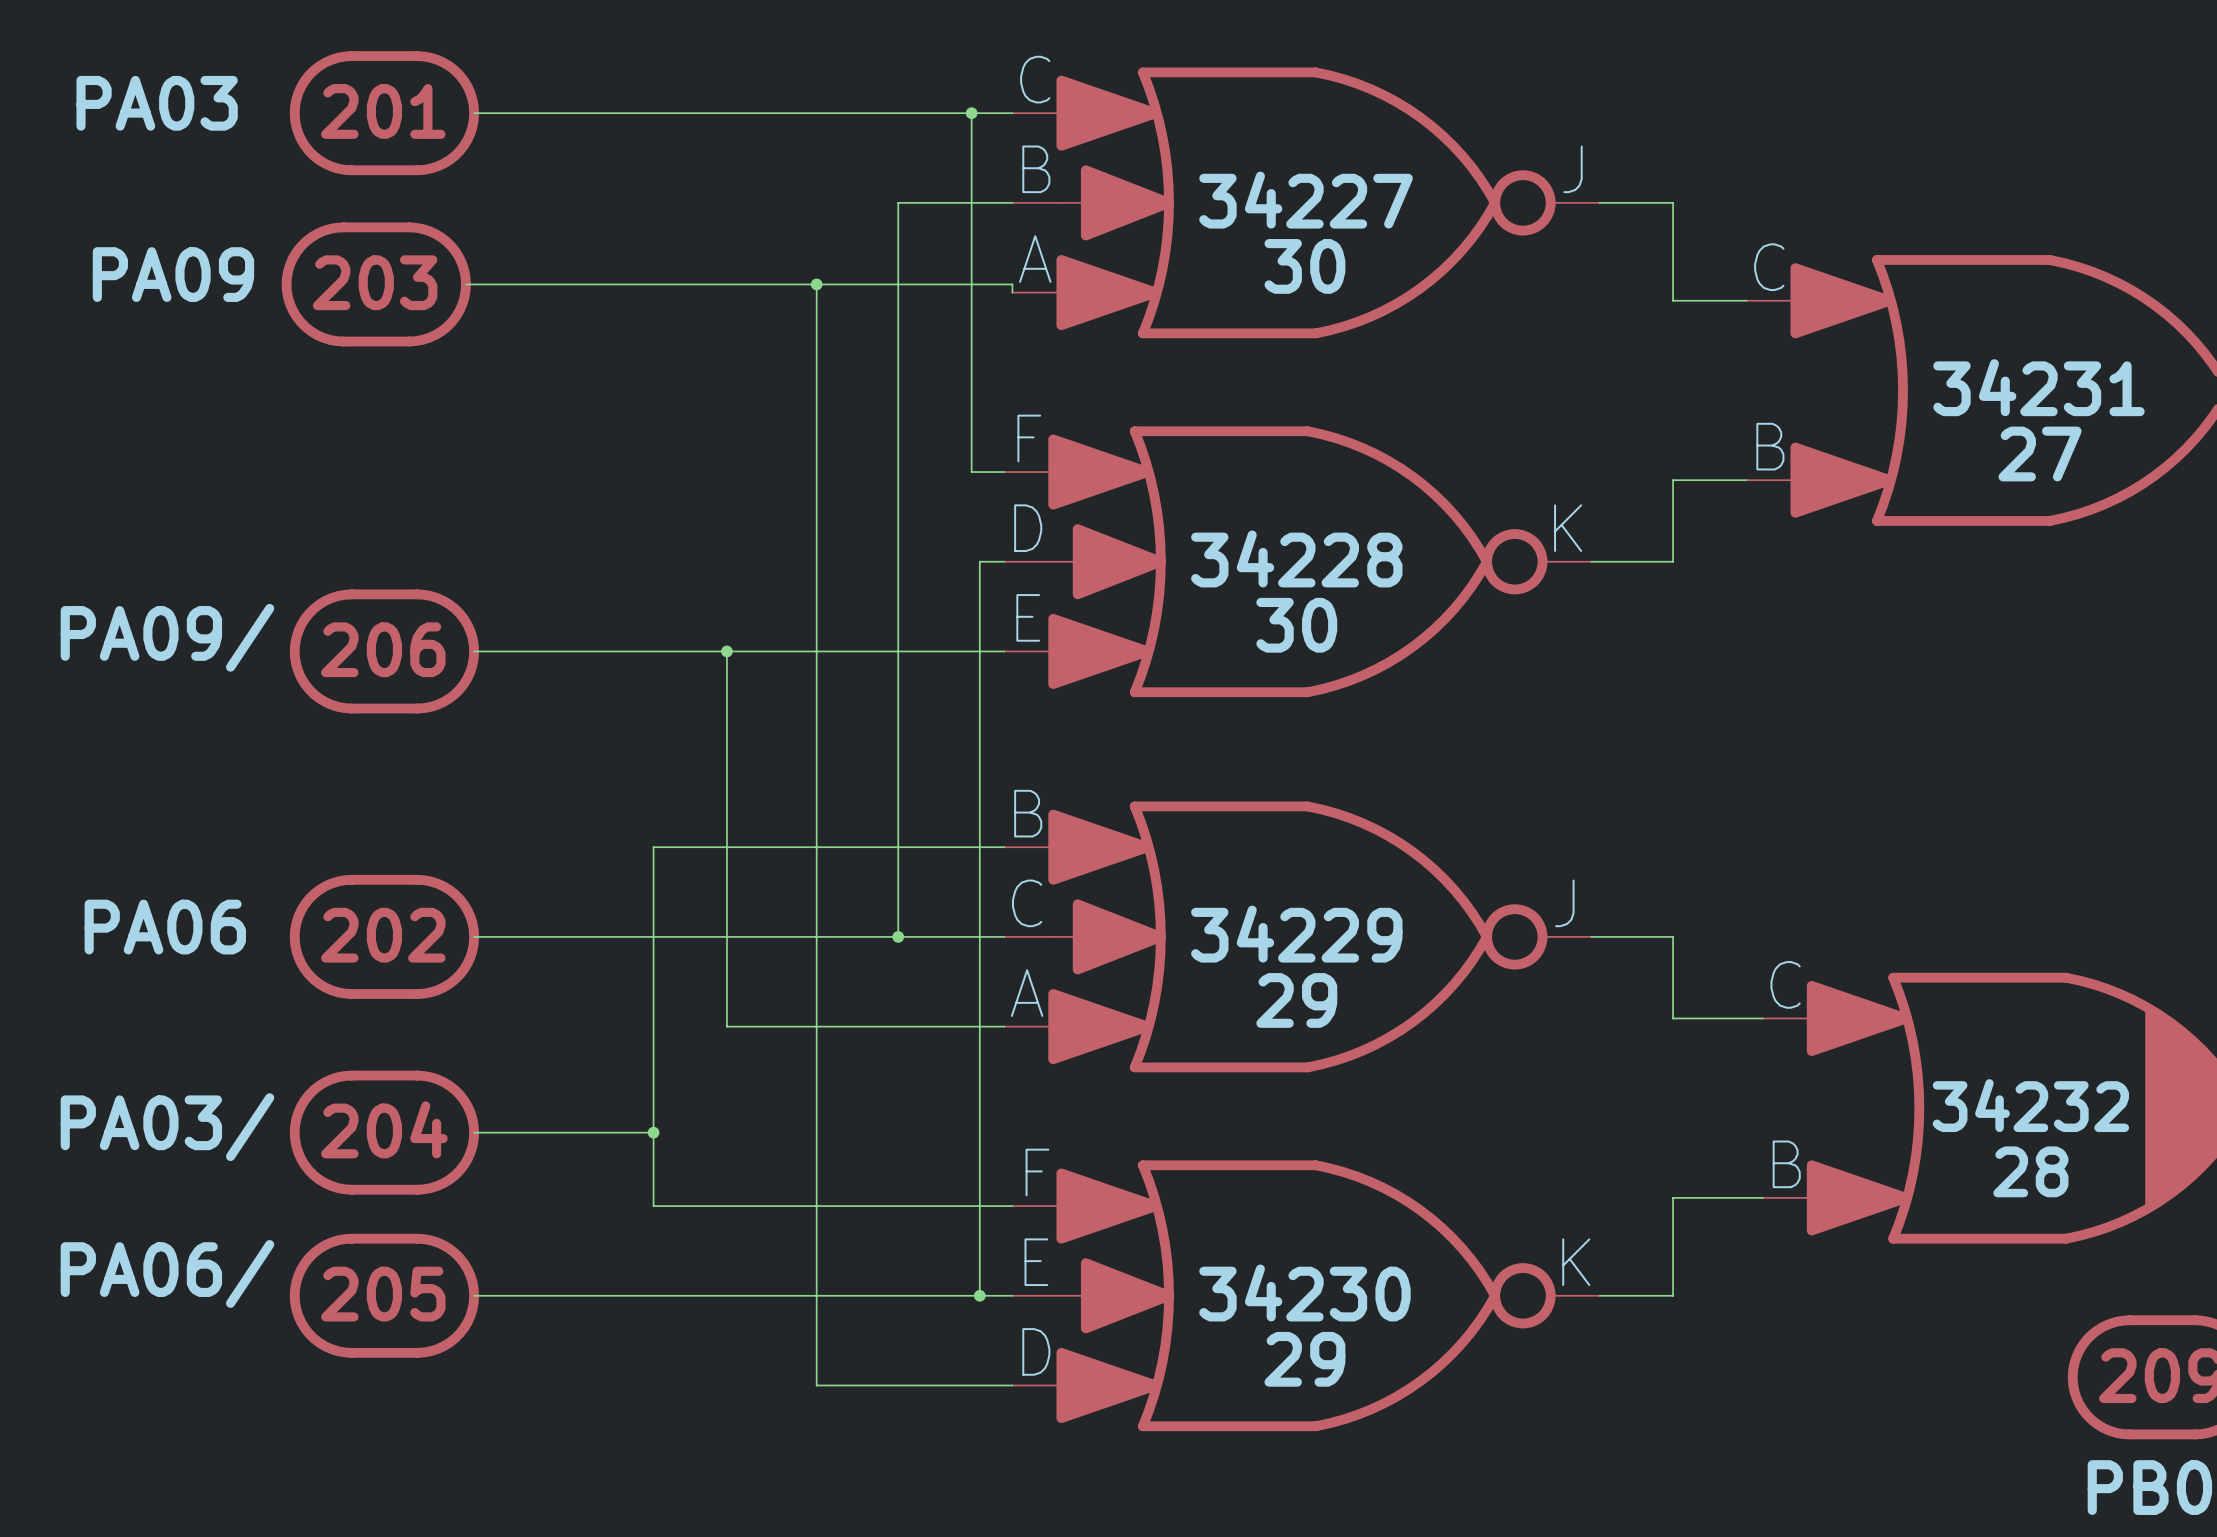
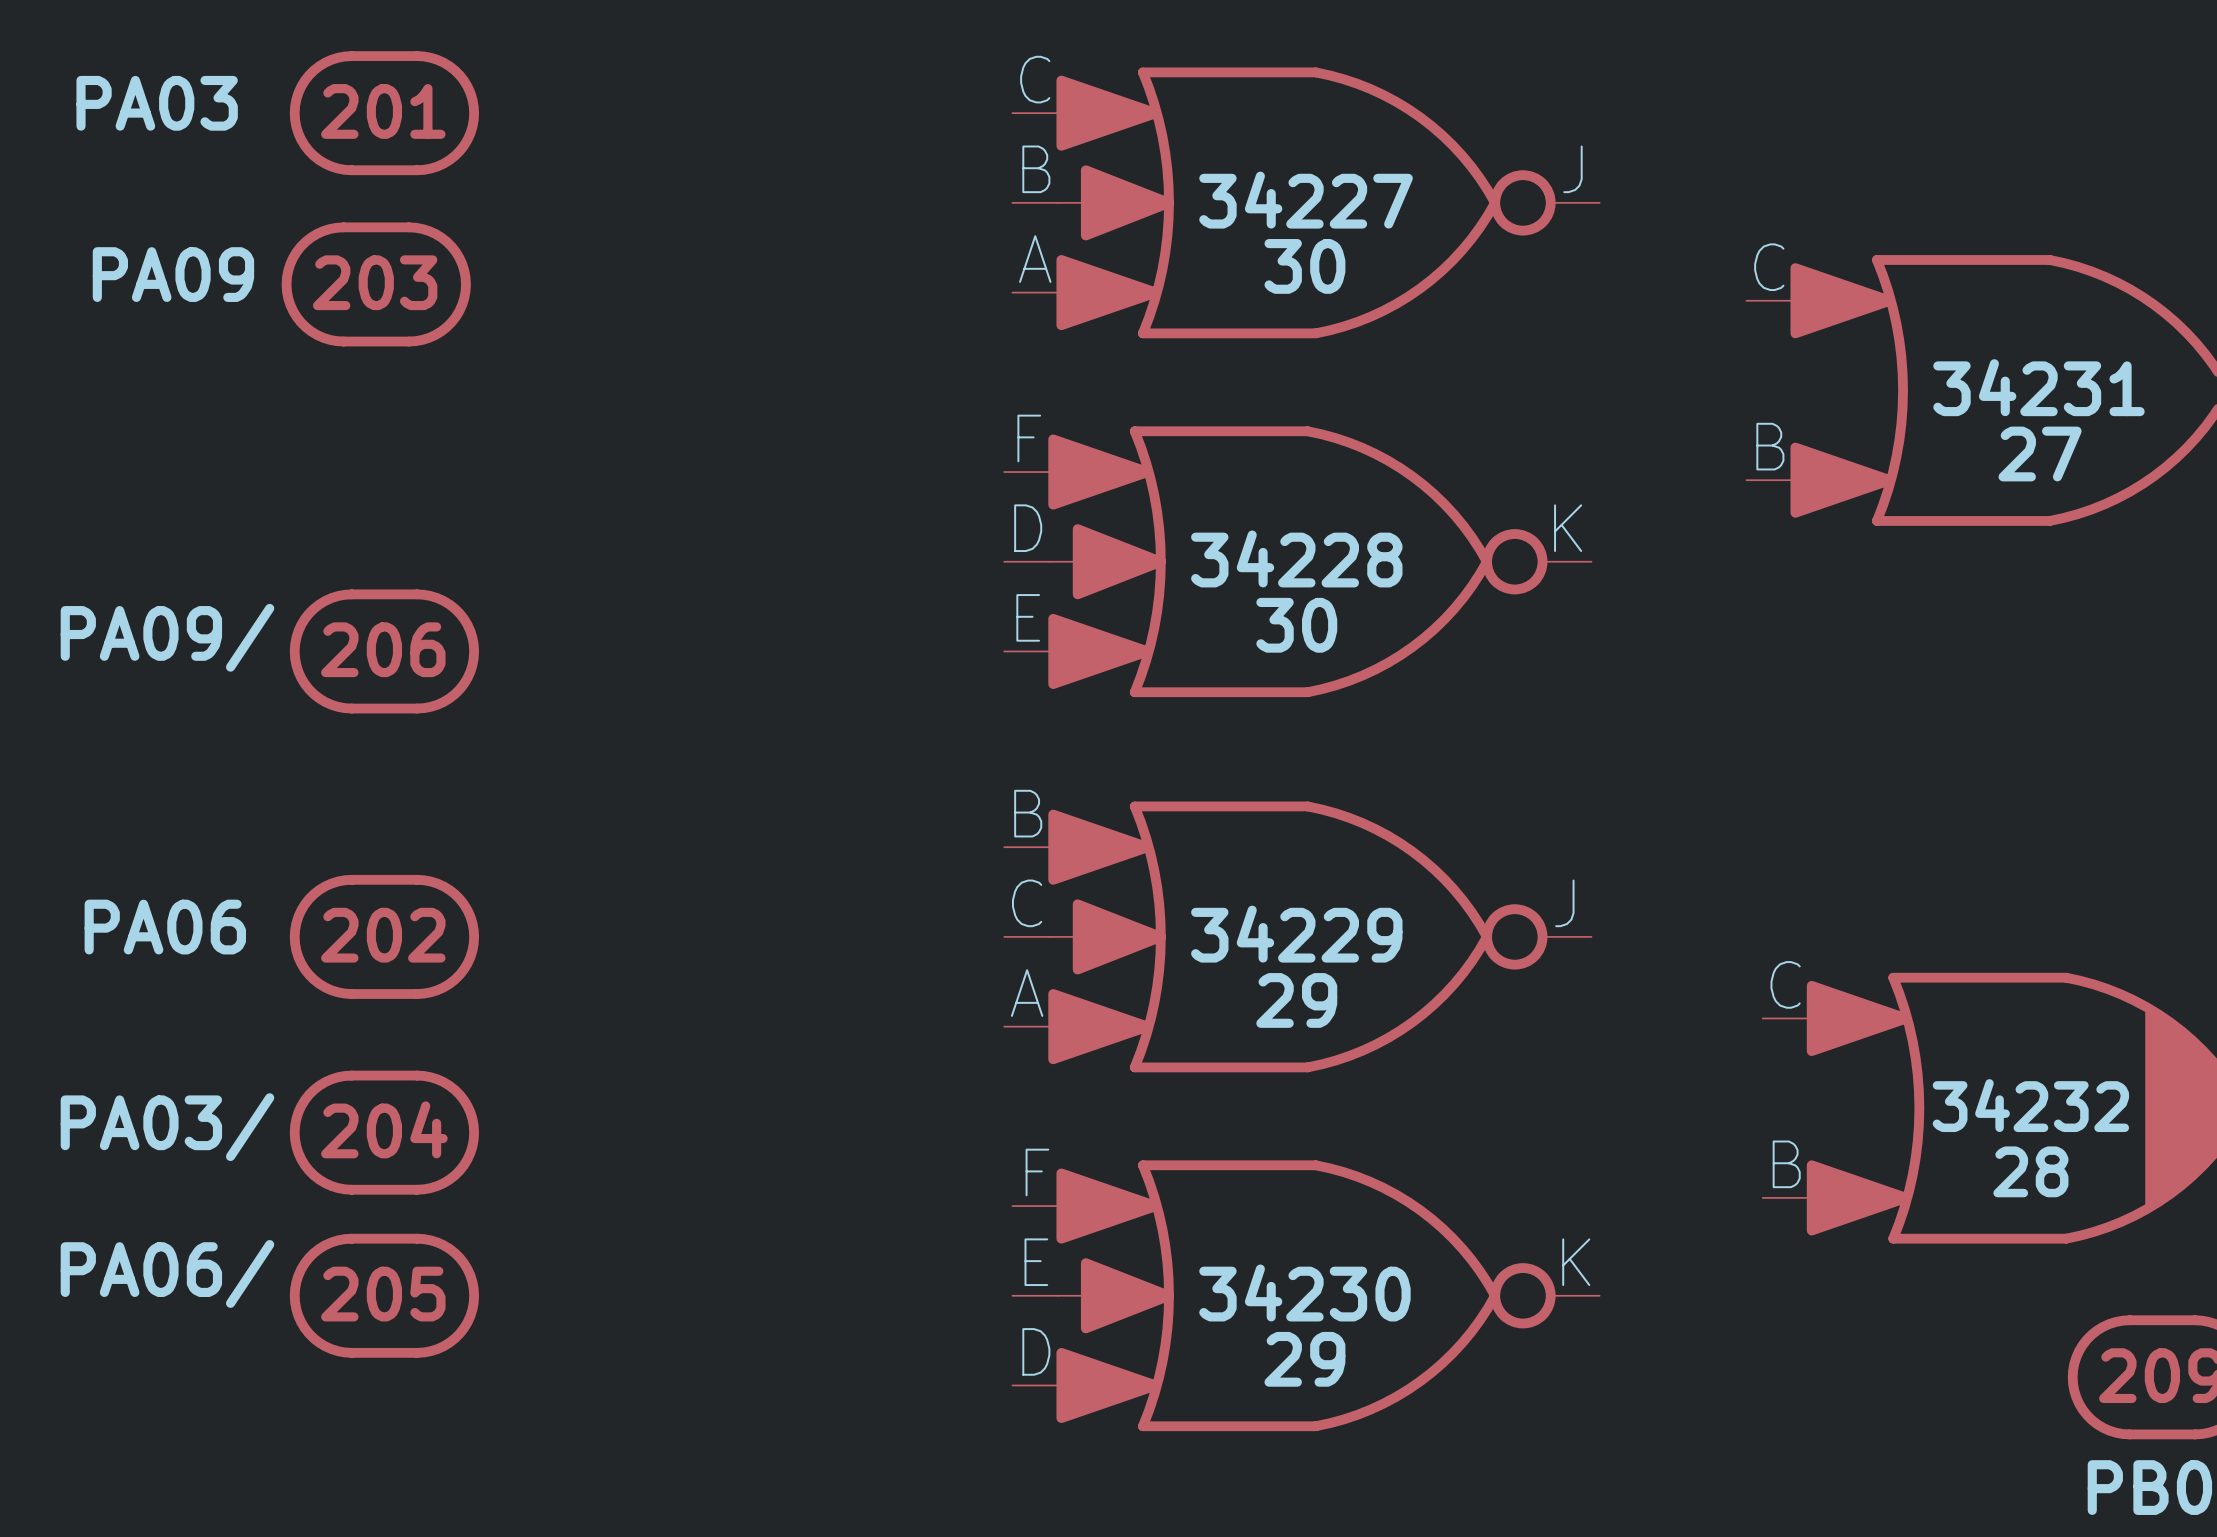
wire: (474, 113) (1012, 113) -> none
wire: (971, 113) (971, 472) (1004, 472) -> none
junction: (971, 113) -> none
wire: (1012, 202) (898, 202) (898, 936) -> none
wire: (1599, 202) (1673, 202) (1673, 300) (1746, 300) -> none
wire: (465, 284) (1012, 284) (1012, 292) -> none
wire: (816, 284) (816, 1385) (1012, 1385) -> none
junction: (816, 284) -> none
wire: (1746, 480) (1673, 480) (1673, 561) (1591, 561) -> none
wire: (1004, 561) (979, 561) (979, 1295) -> none
wire: (474, 651) (1004, 651) -> none
wire: (726, 651) (726, 1026) (1004, 1026) -> none
junction: (726, 651) -> none
wire: (1004, 847) (653, 847) (653, 1206) (1012, 1206) -> none
wire: (474, 936) (1004, 936) -> none
junction: (898, 936) -> none
wire: (1591, 936) (1673, 936) (1673, 1018) (1762, 1018) -> none
wire: (474, 1132) (653, 1132) -> none
junction: (653, 1132) -> none
wire: (1762, 1197) (1673, 1197) (1673, 1295) (1599, 1295) -> none
wire: (474, 1295) (1012, 1295) -> none
junction: (979, 1295) -> none

